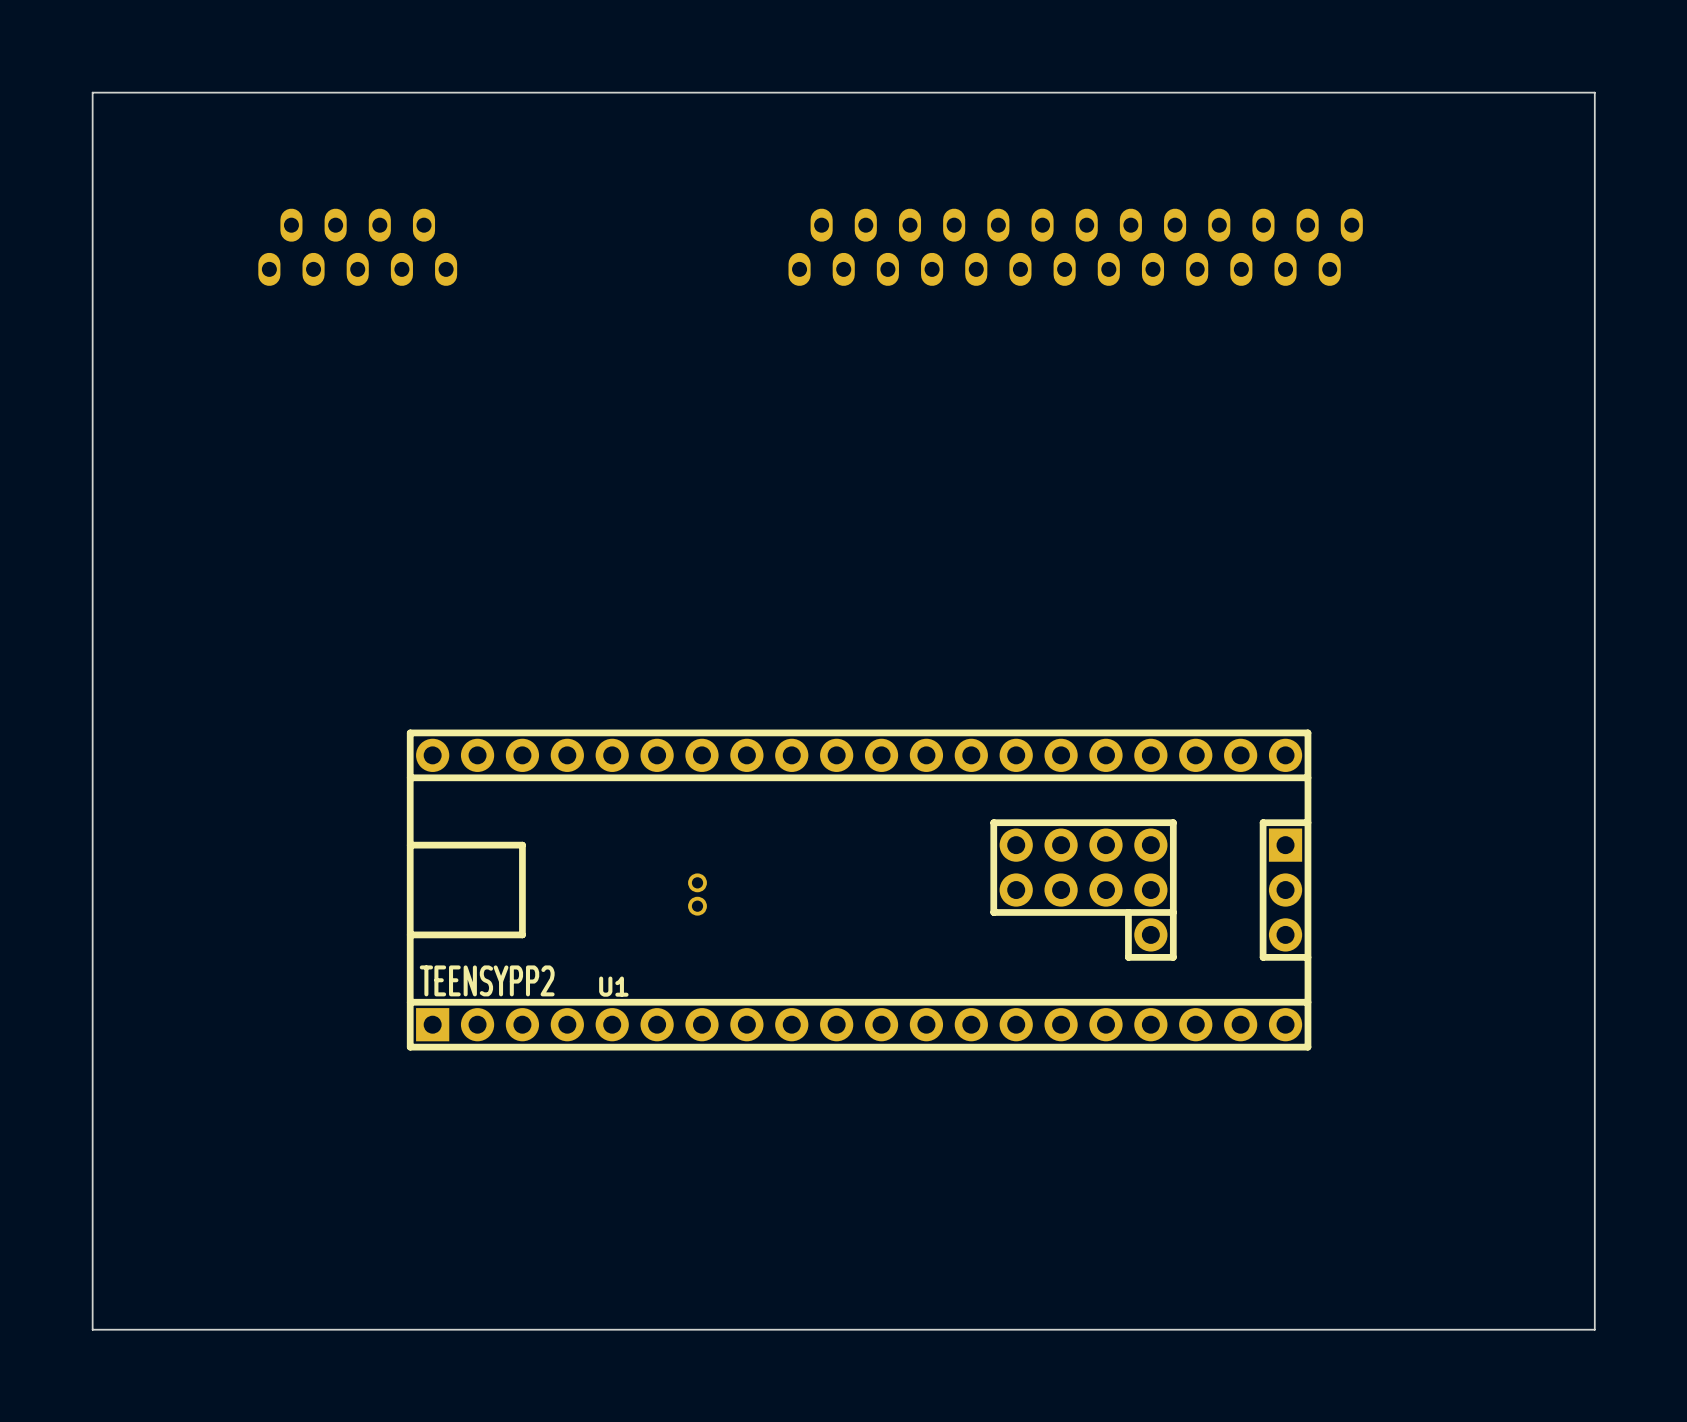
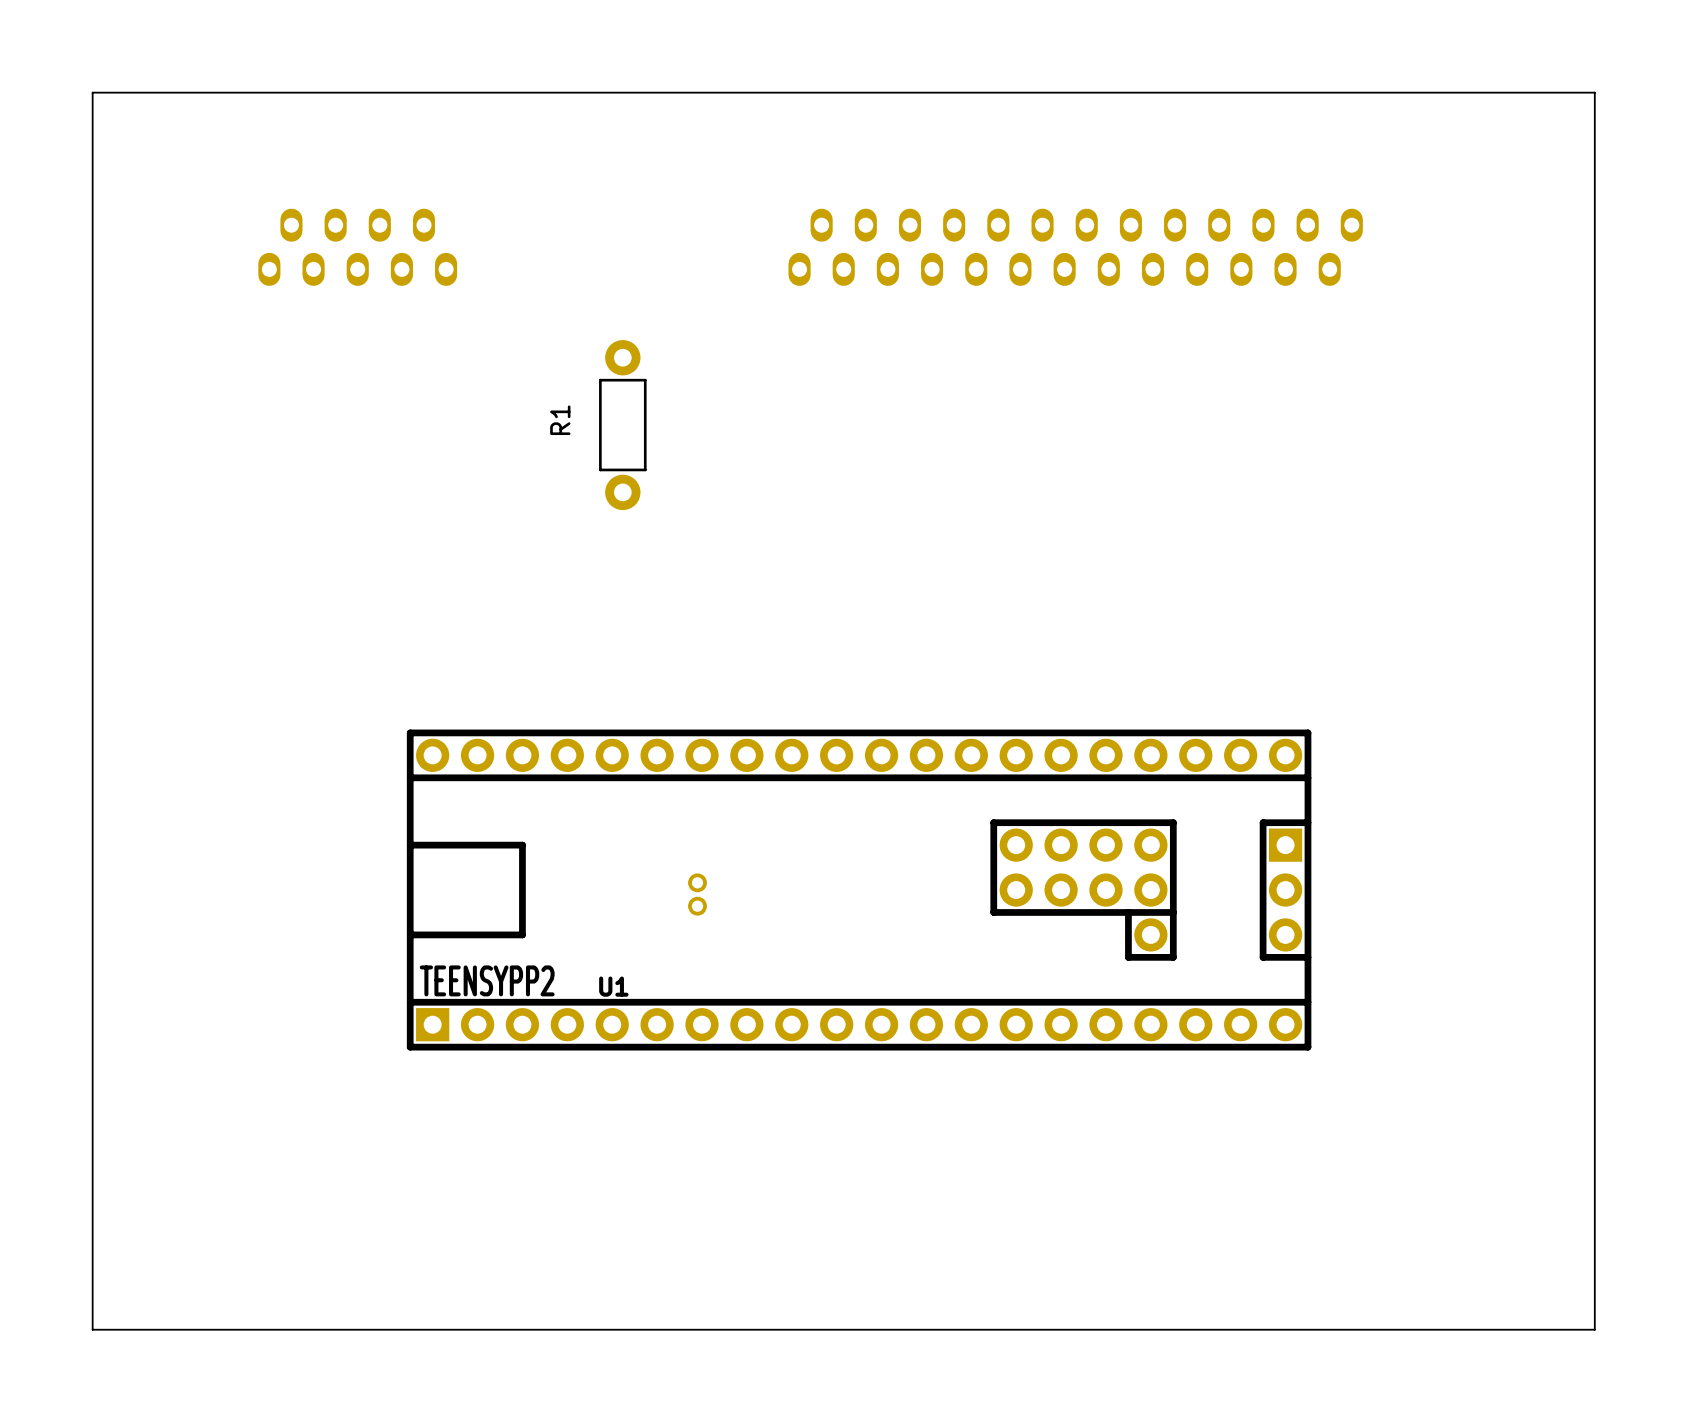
R1: none -> (622, 425)

